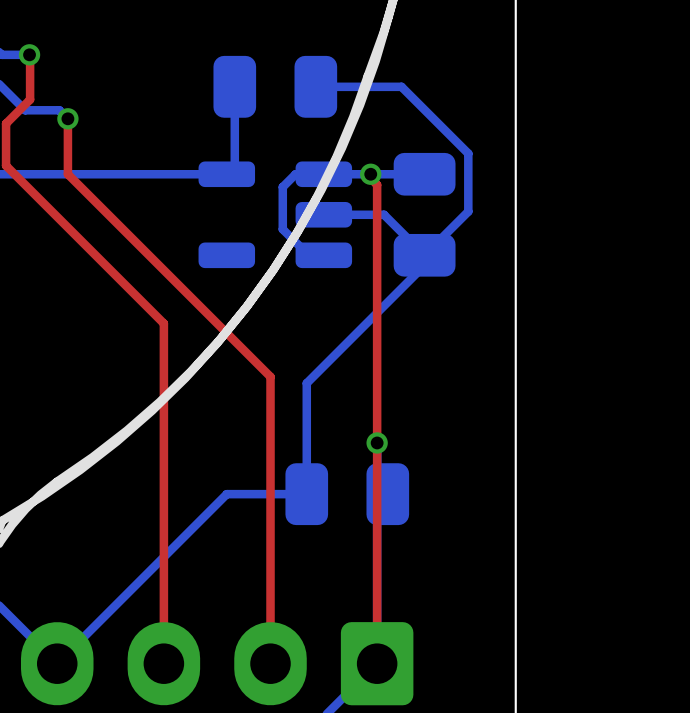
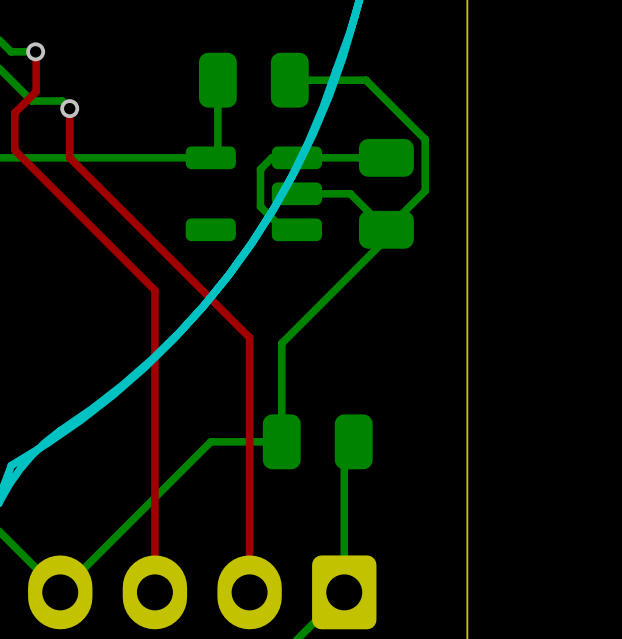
top track: (370, 174) (370, 178) (377, 184) (377, 663) -> none
via: (370, 174) -> none
via: (377, 442) -> none

